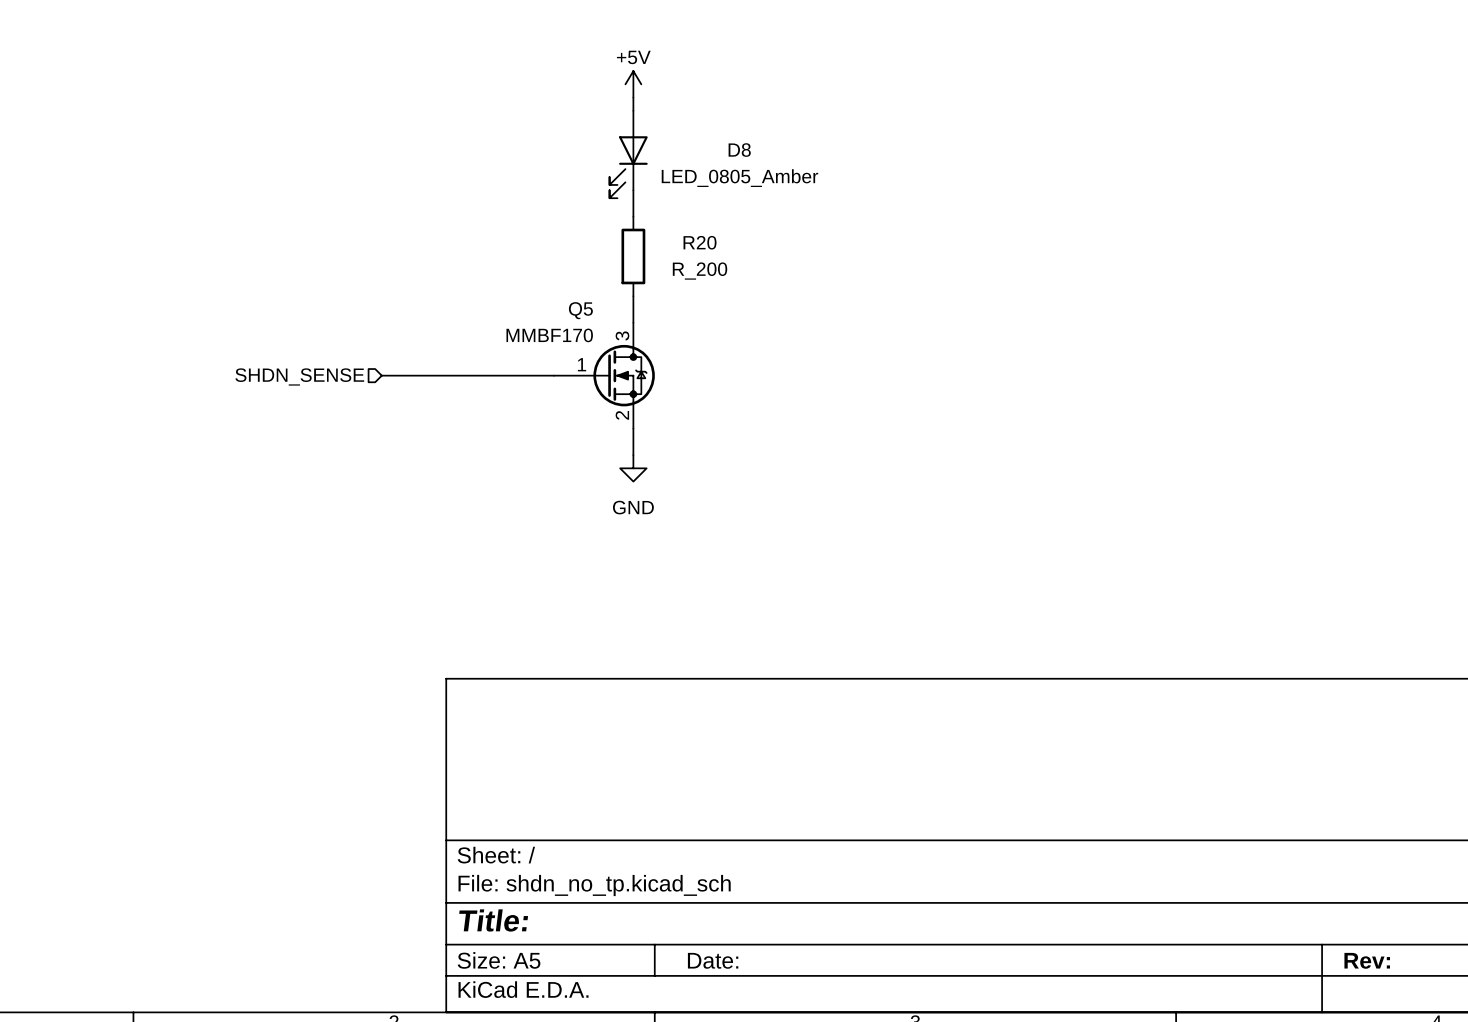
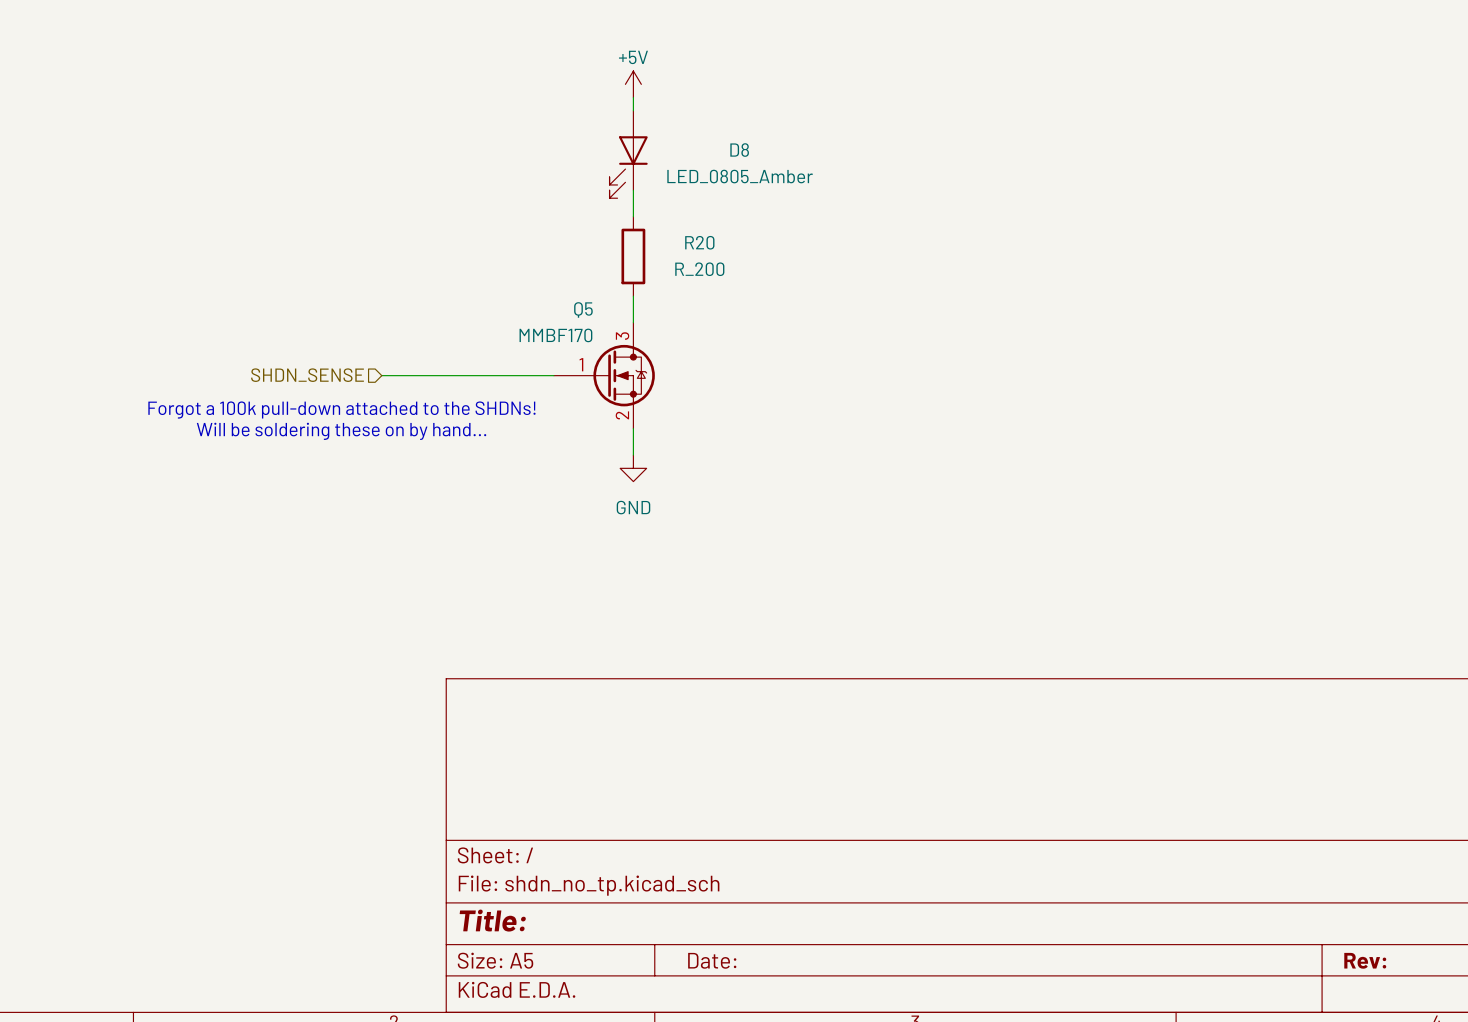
text: none -> Forgot a 100k pull-down attached to the SHDNs! (341, 410)
text: none -> Will be soldering these on by hand... (341, 431)

